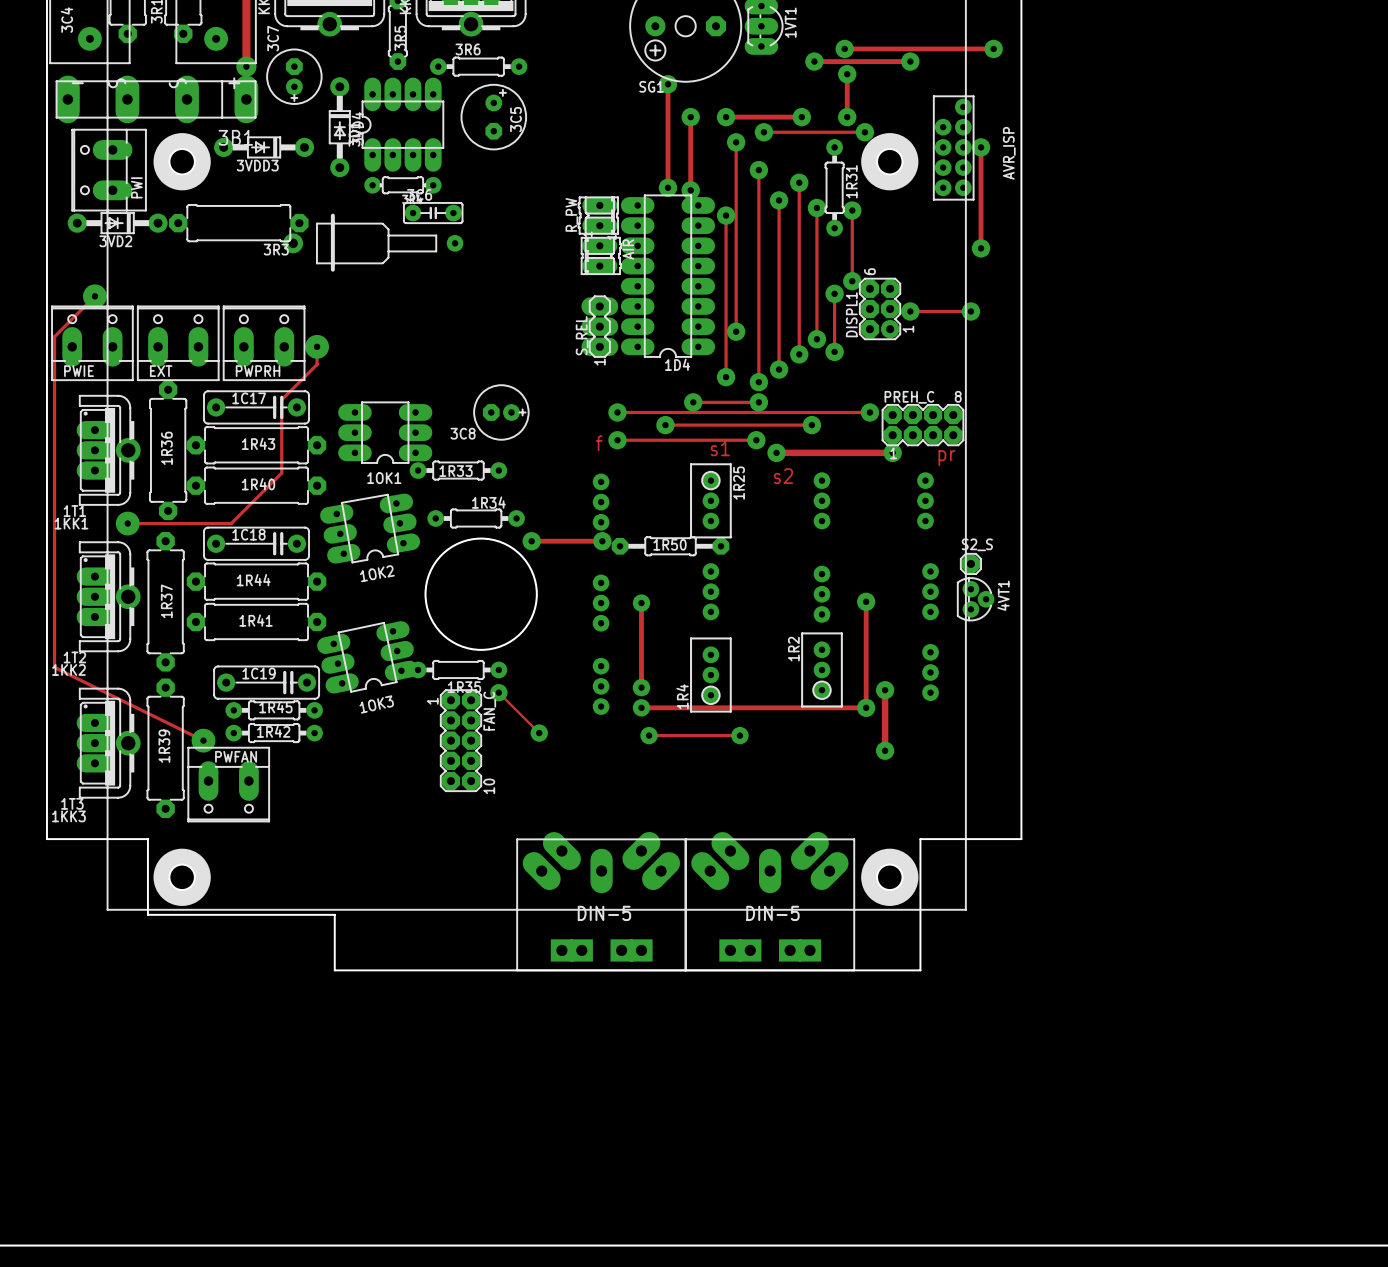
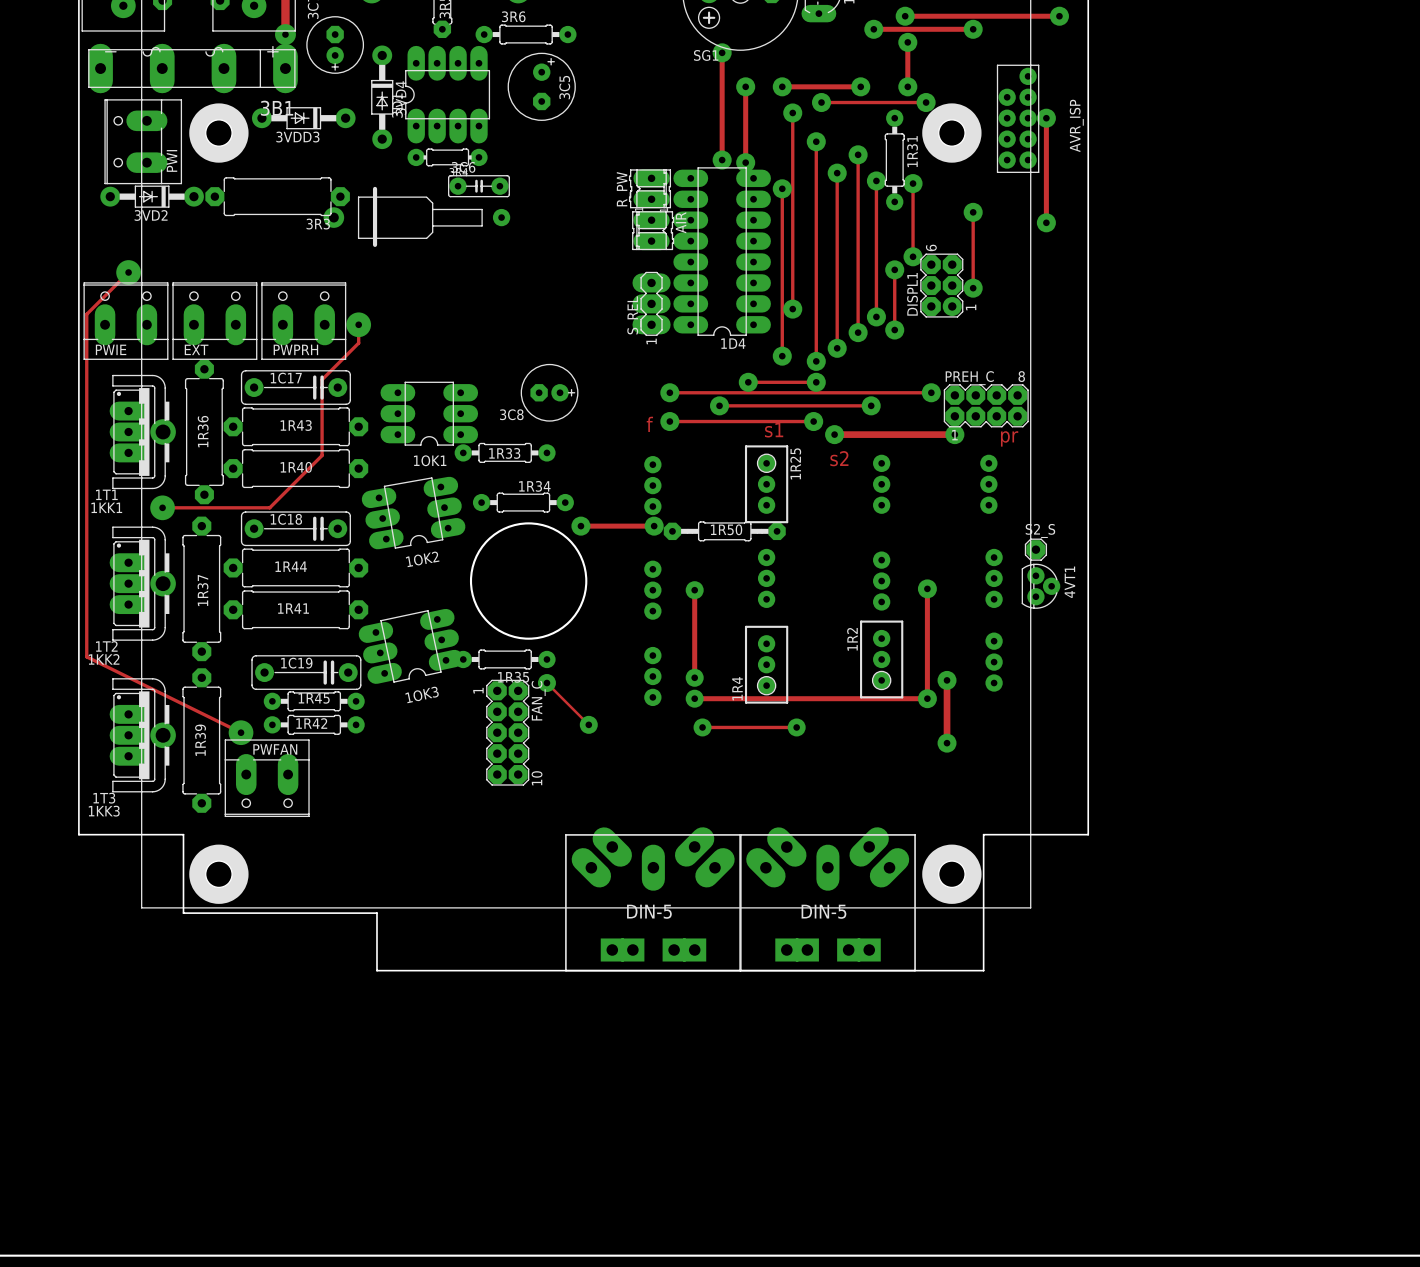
via: none -> (973, 212)
track: (910, 311) (970, 311) -> (973, 288) (973, 212)
via: (970, 311) -> none

